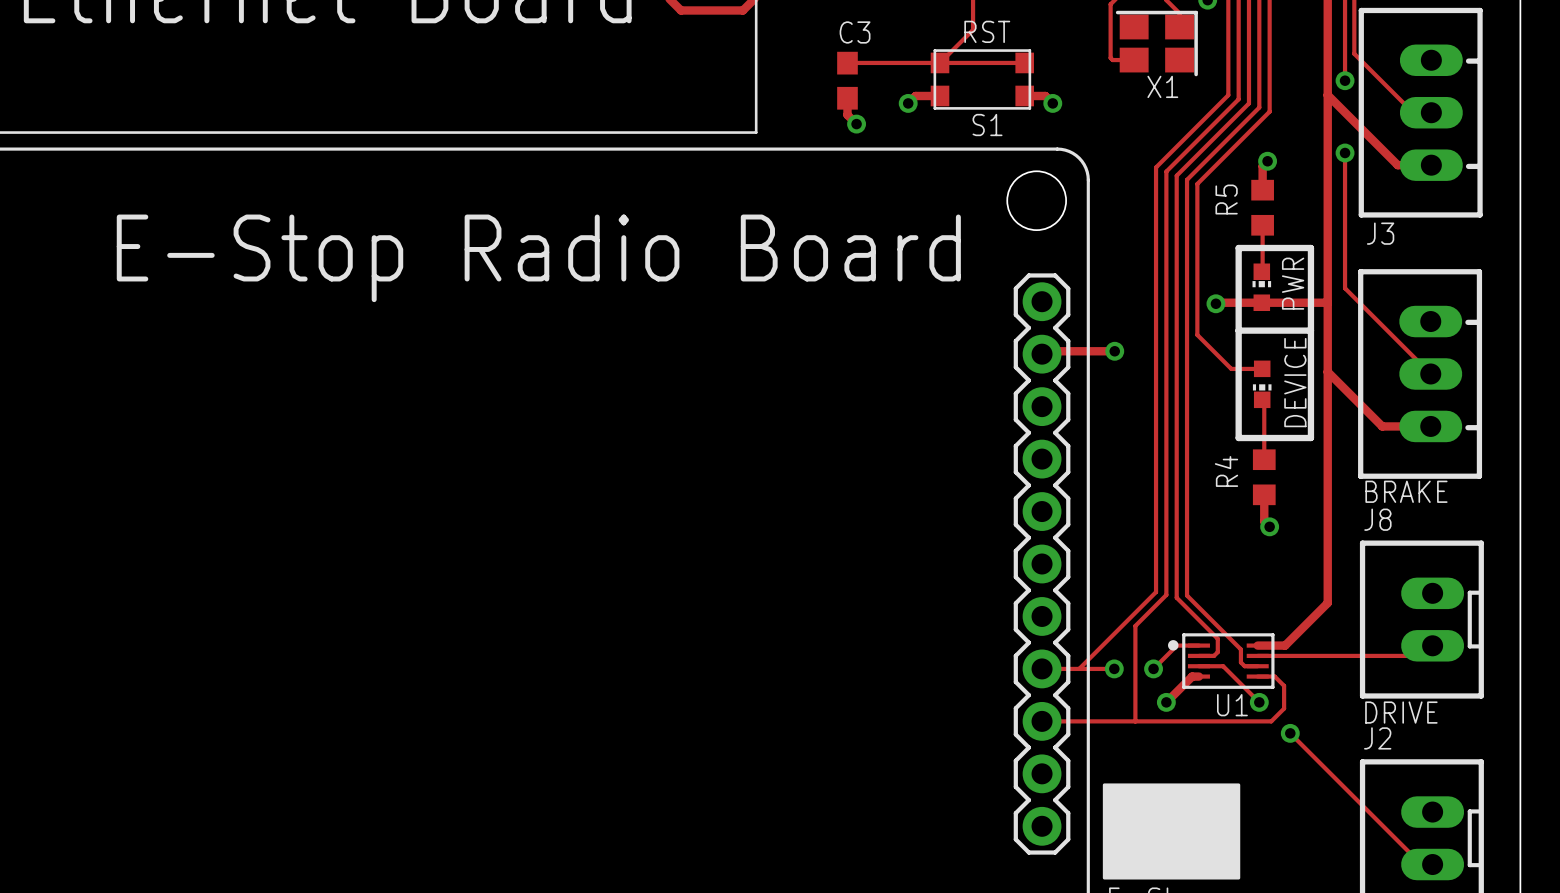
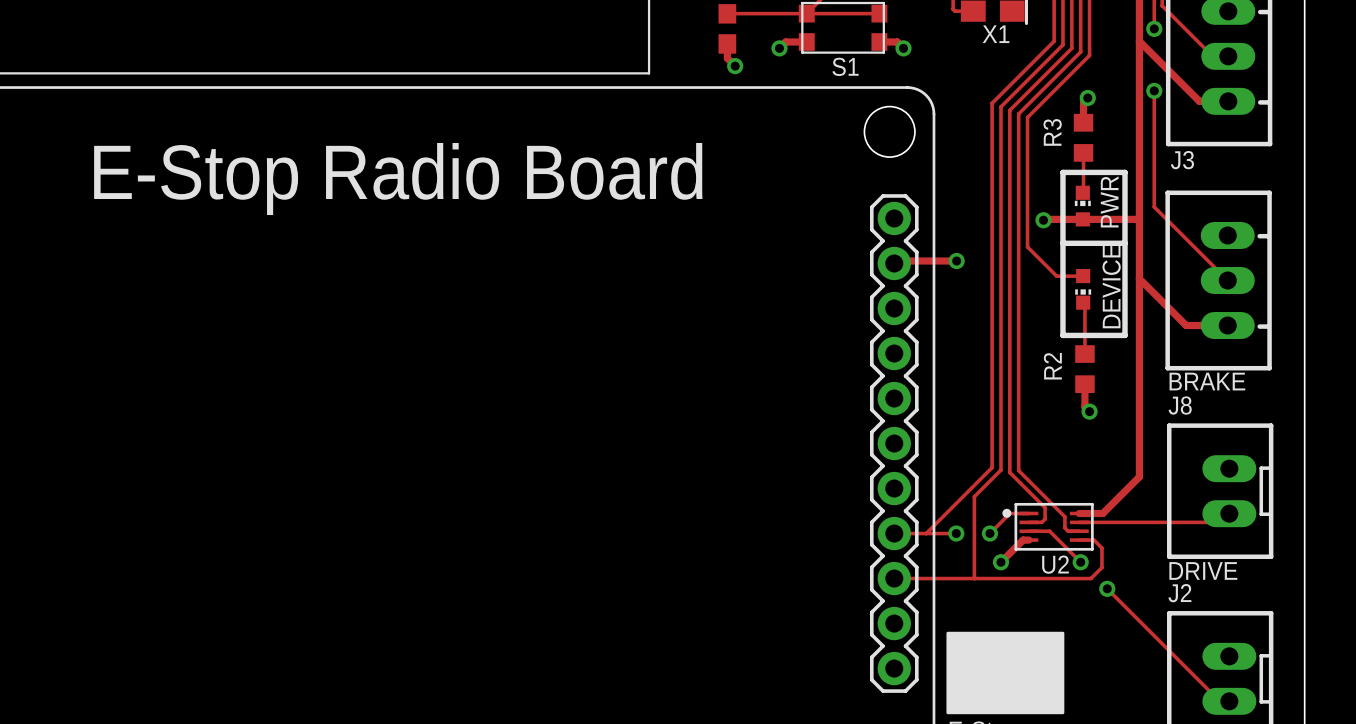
R5 name: R5 (1226, 199) -> R3 (1052, 132)
R4 name: R4 (1226, 471) -> R2 (1052, 366)
U1 name: U1 (1232, 705) -> U2 (1055, 564)

